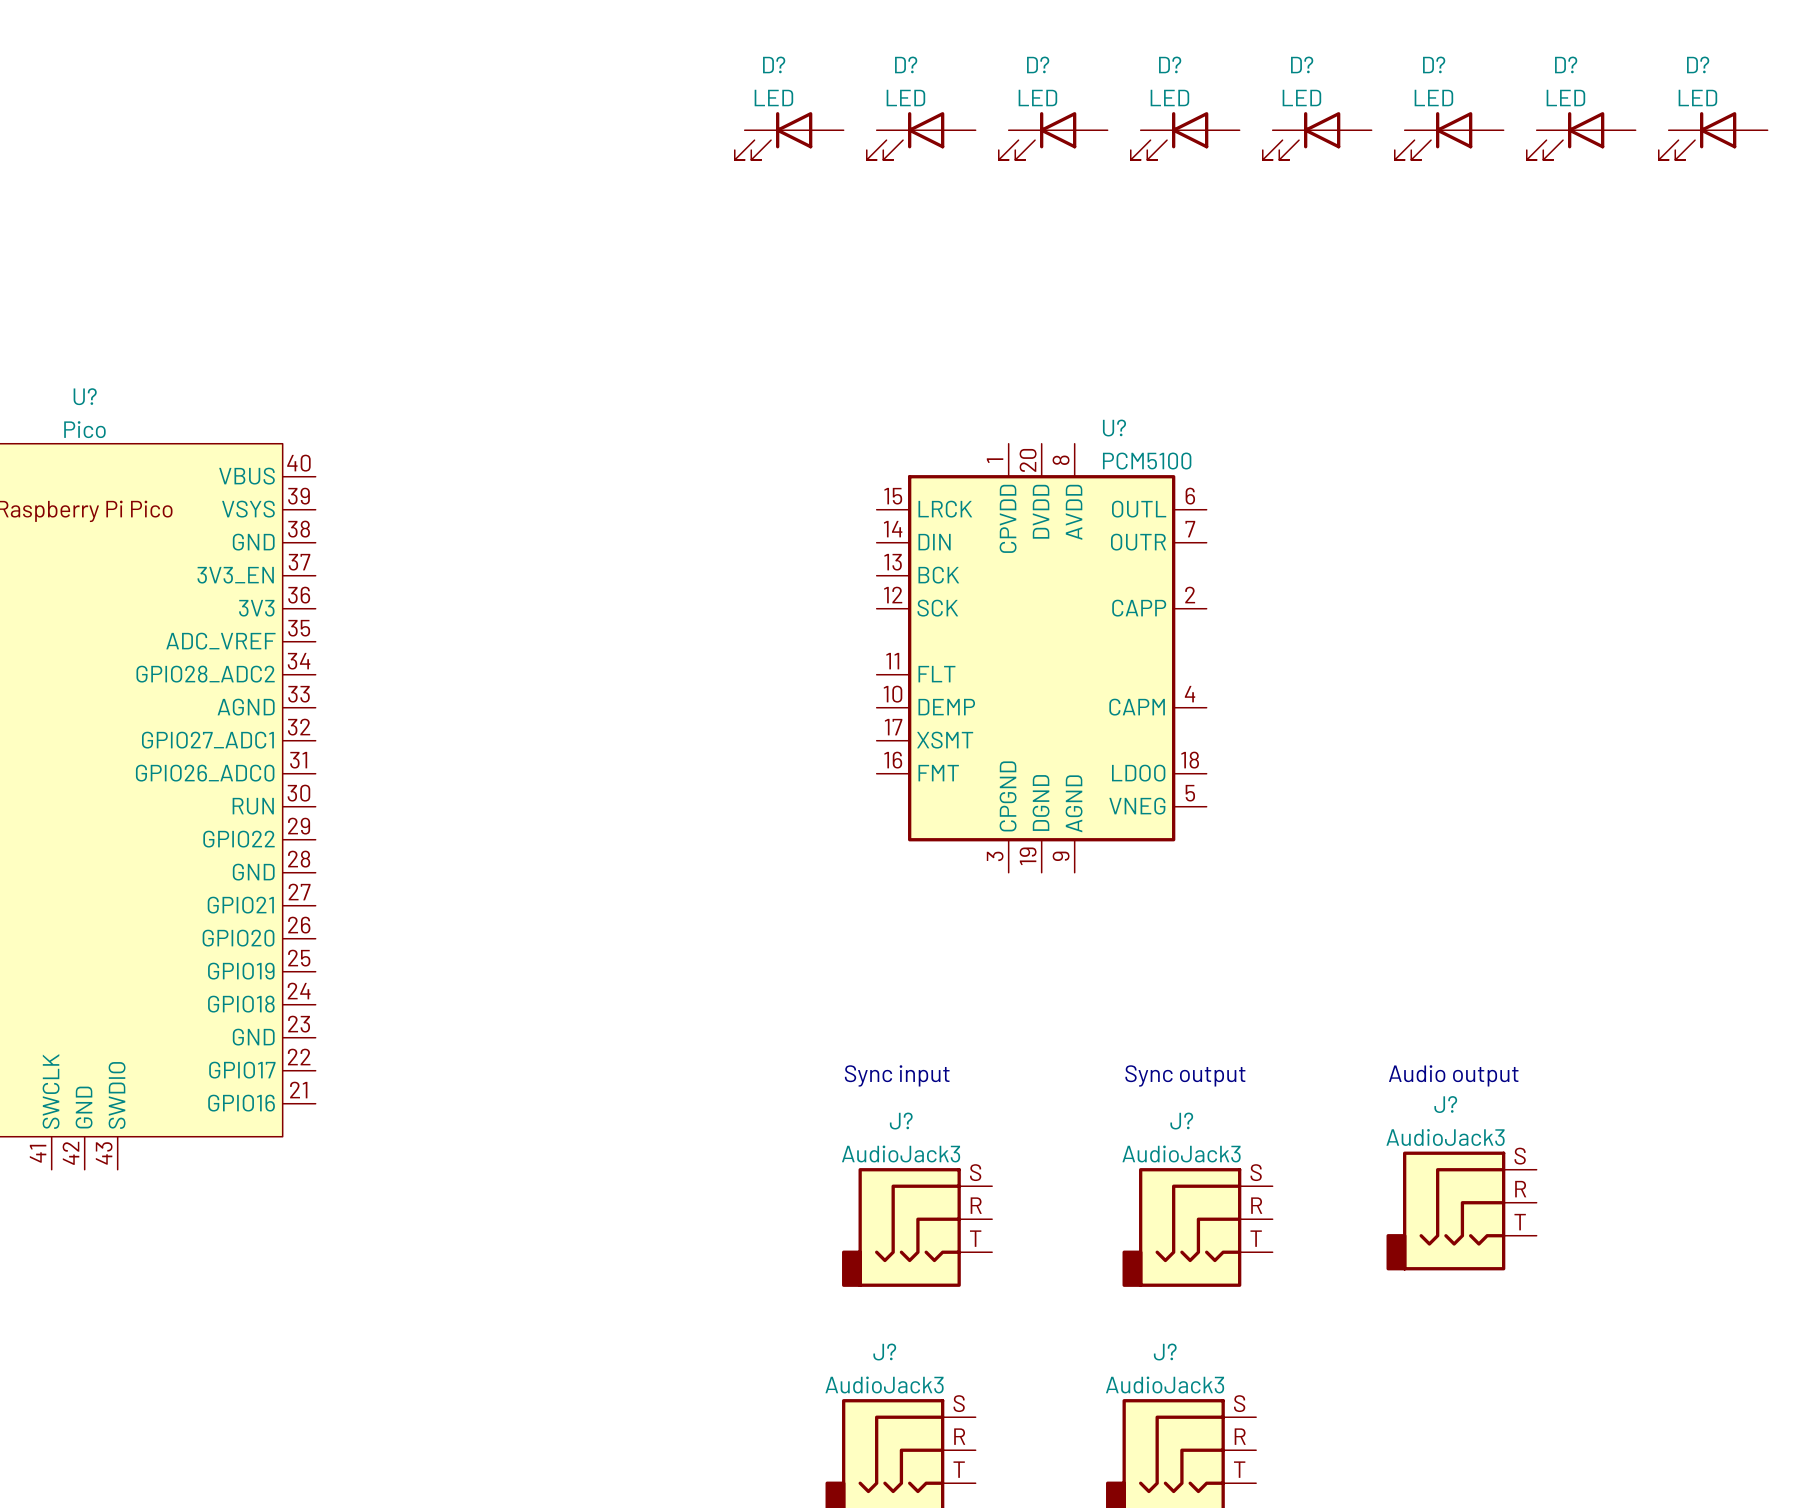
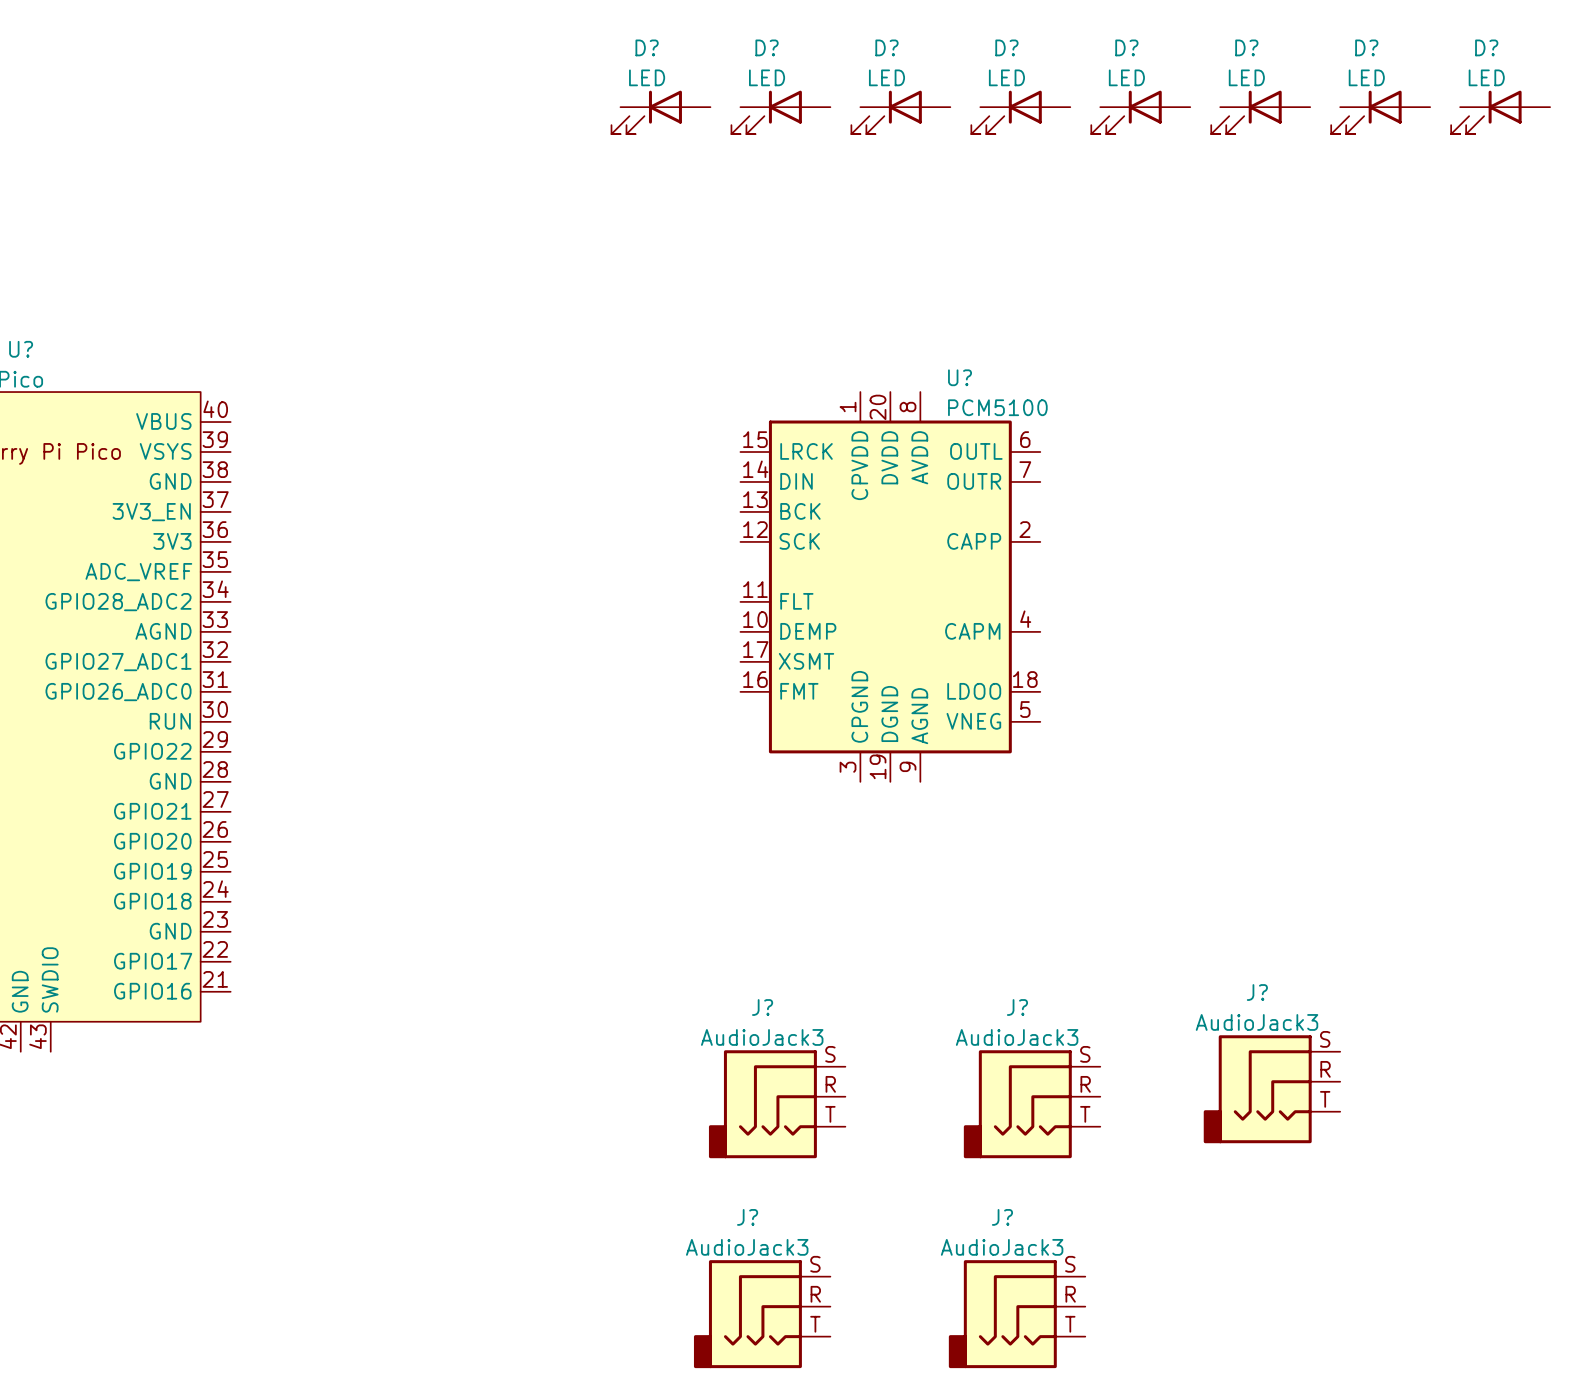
text: Sync input (897, 1075) -> none
text: Sync output (1185, 1075) -> none
text: Audio output (1453, 1075) -> none

